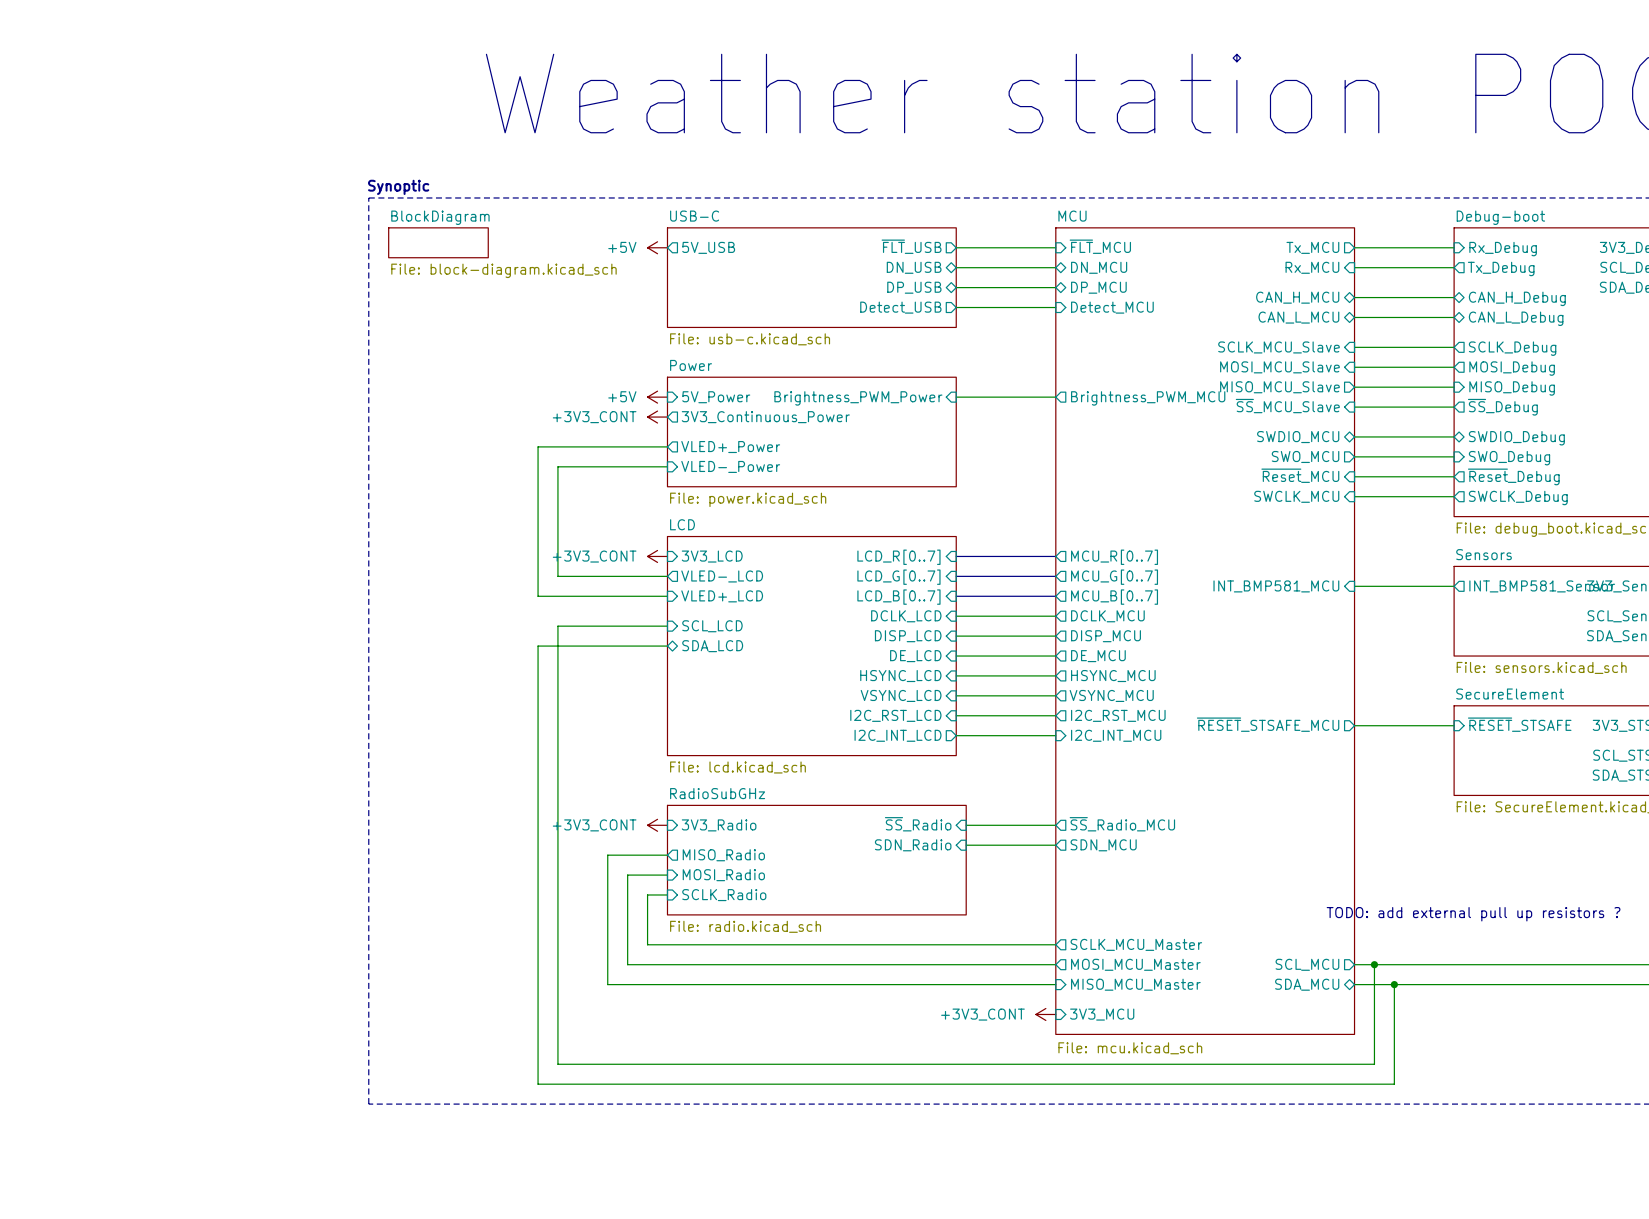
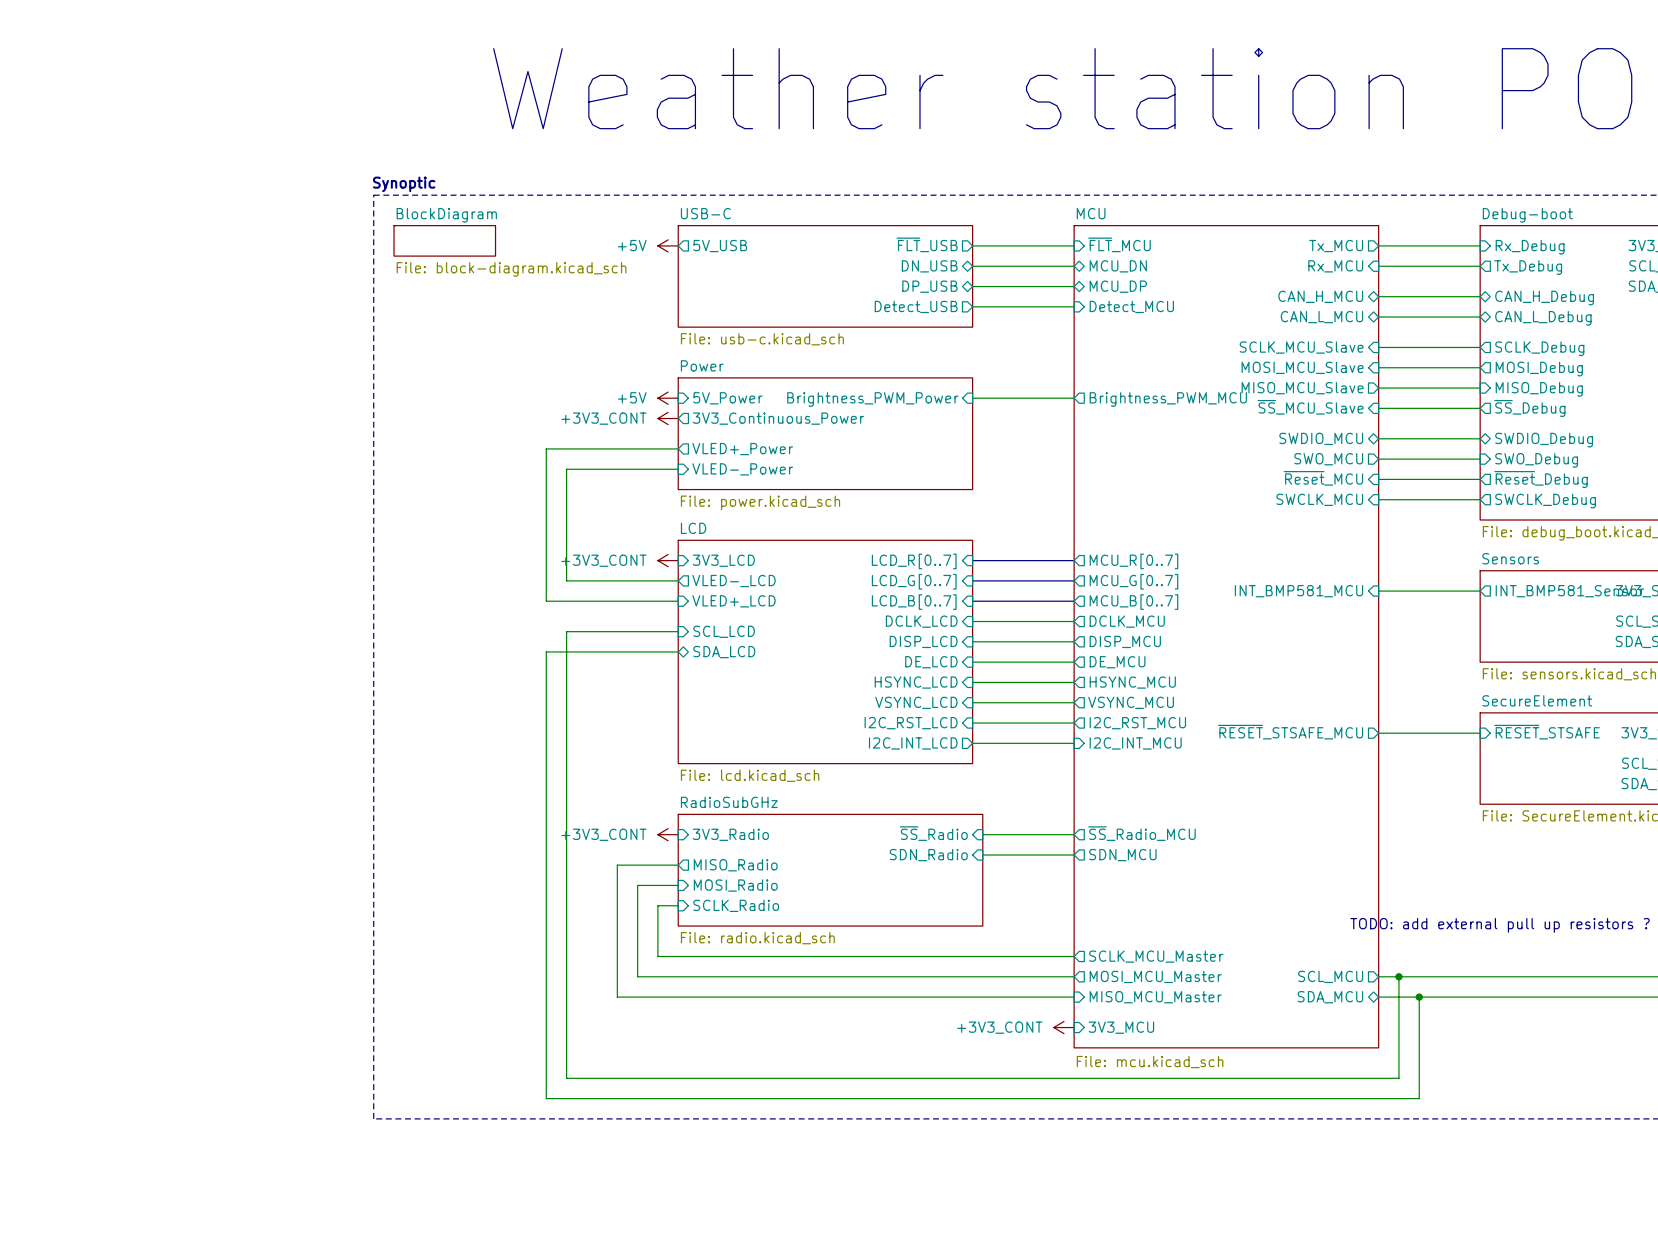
sheet pin: DN_MCU (1099, 267) -> MCU_DN (1118, 266)
sheet pin: DP_MCU (1098, 287) -> MCU_DP (1118, 286)

